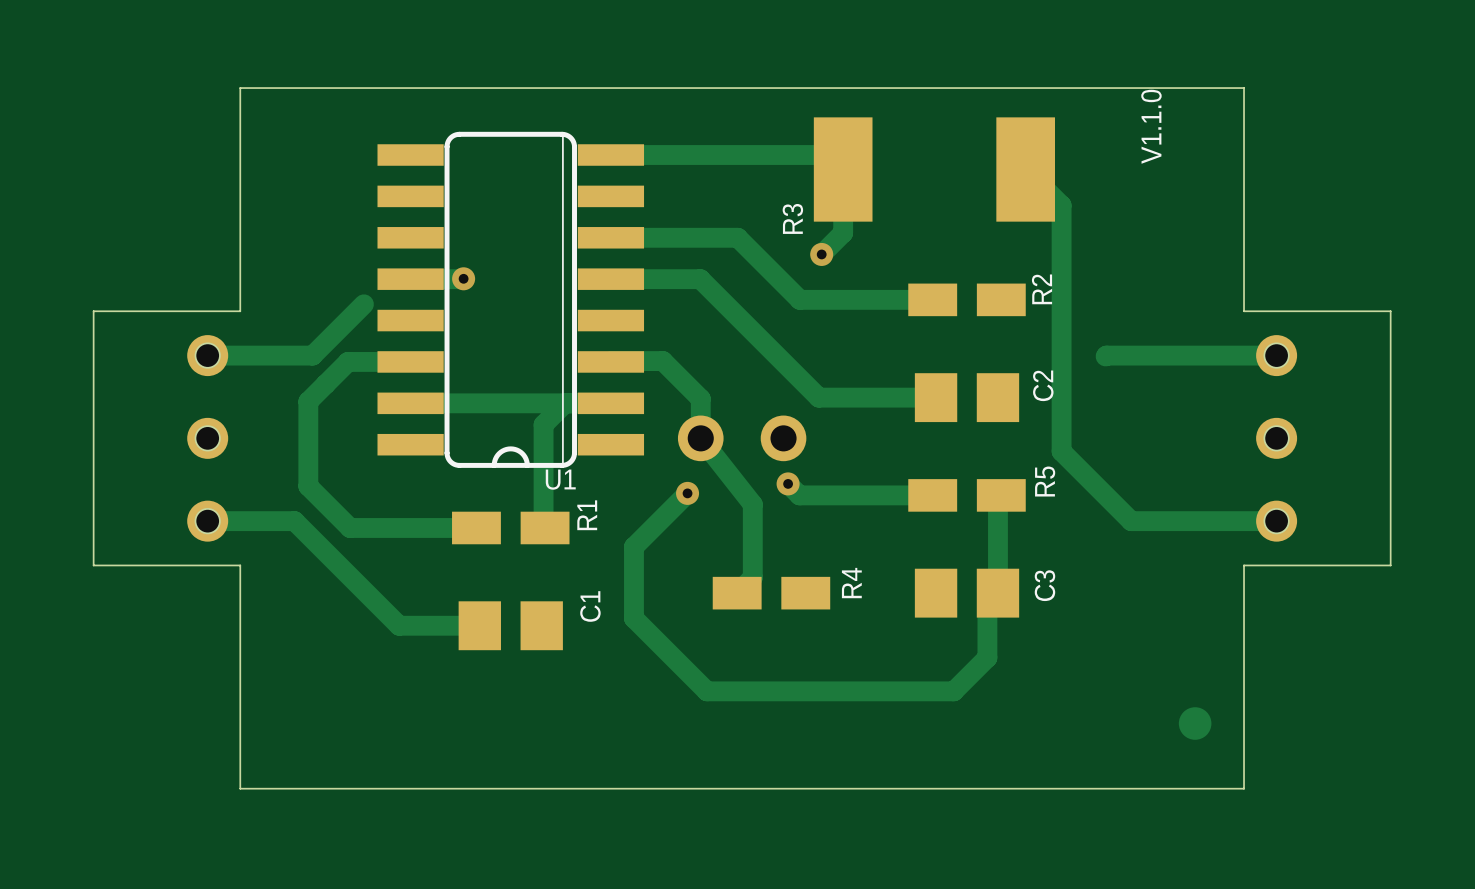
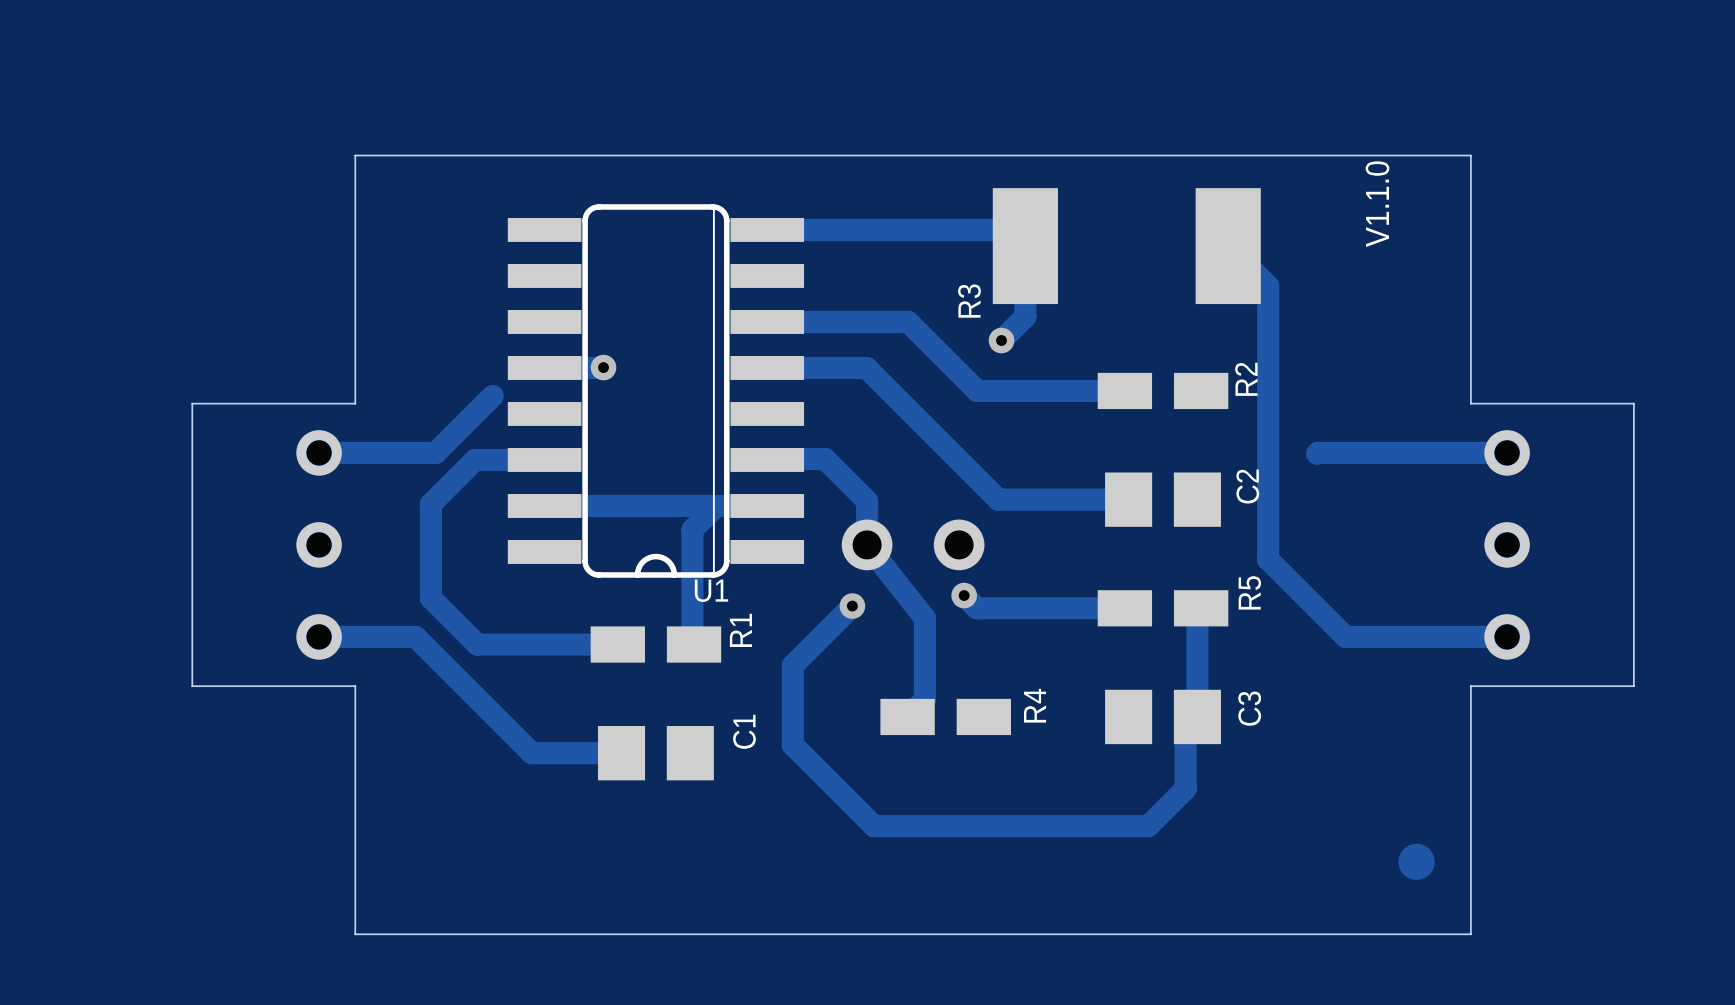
drawing: none -> [1365, 161, 1390, 248]
text: V1.1.0 (1151, 126) -> none

